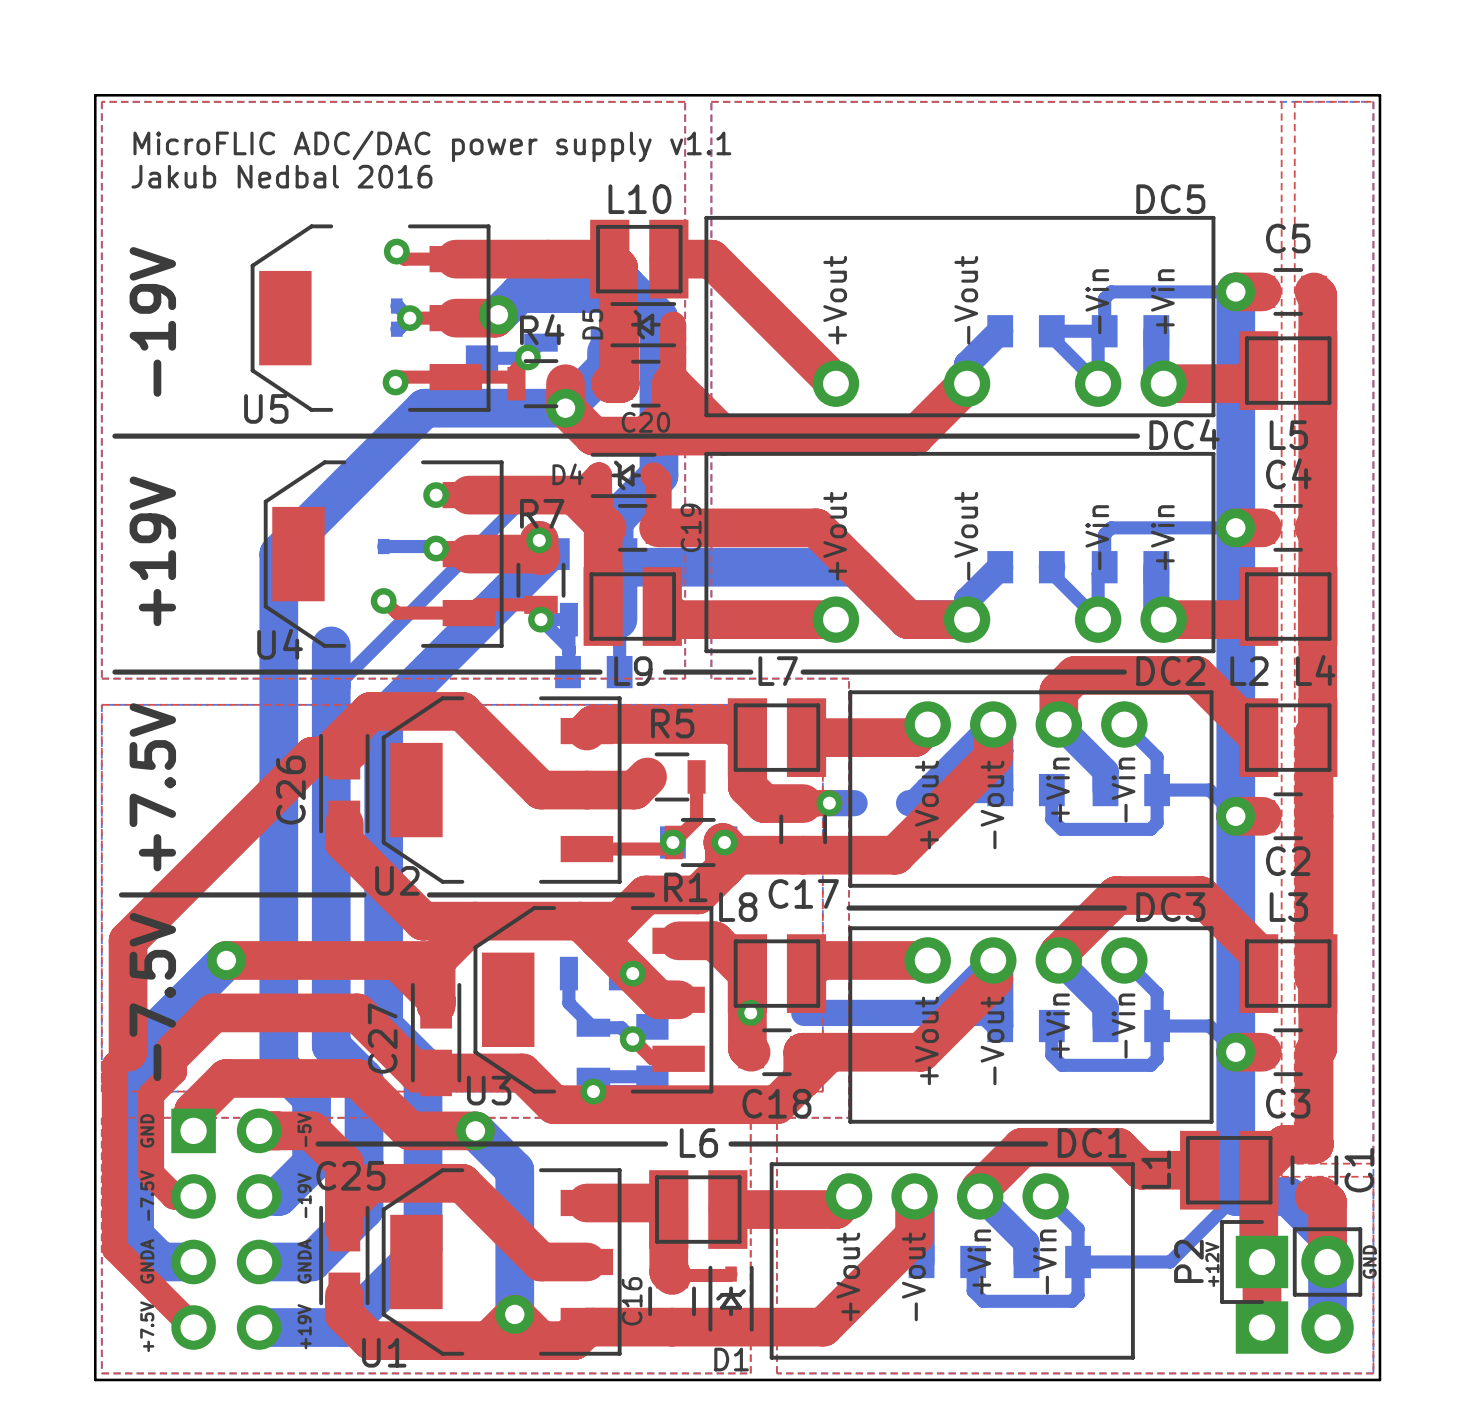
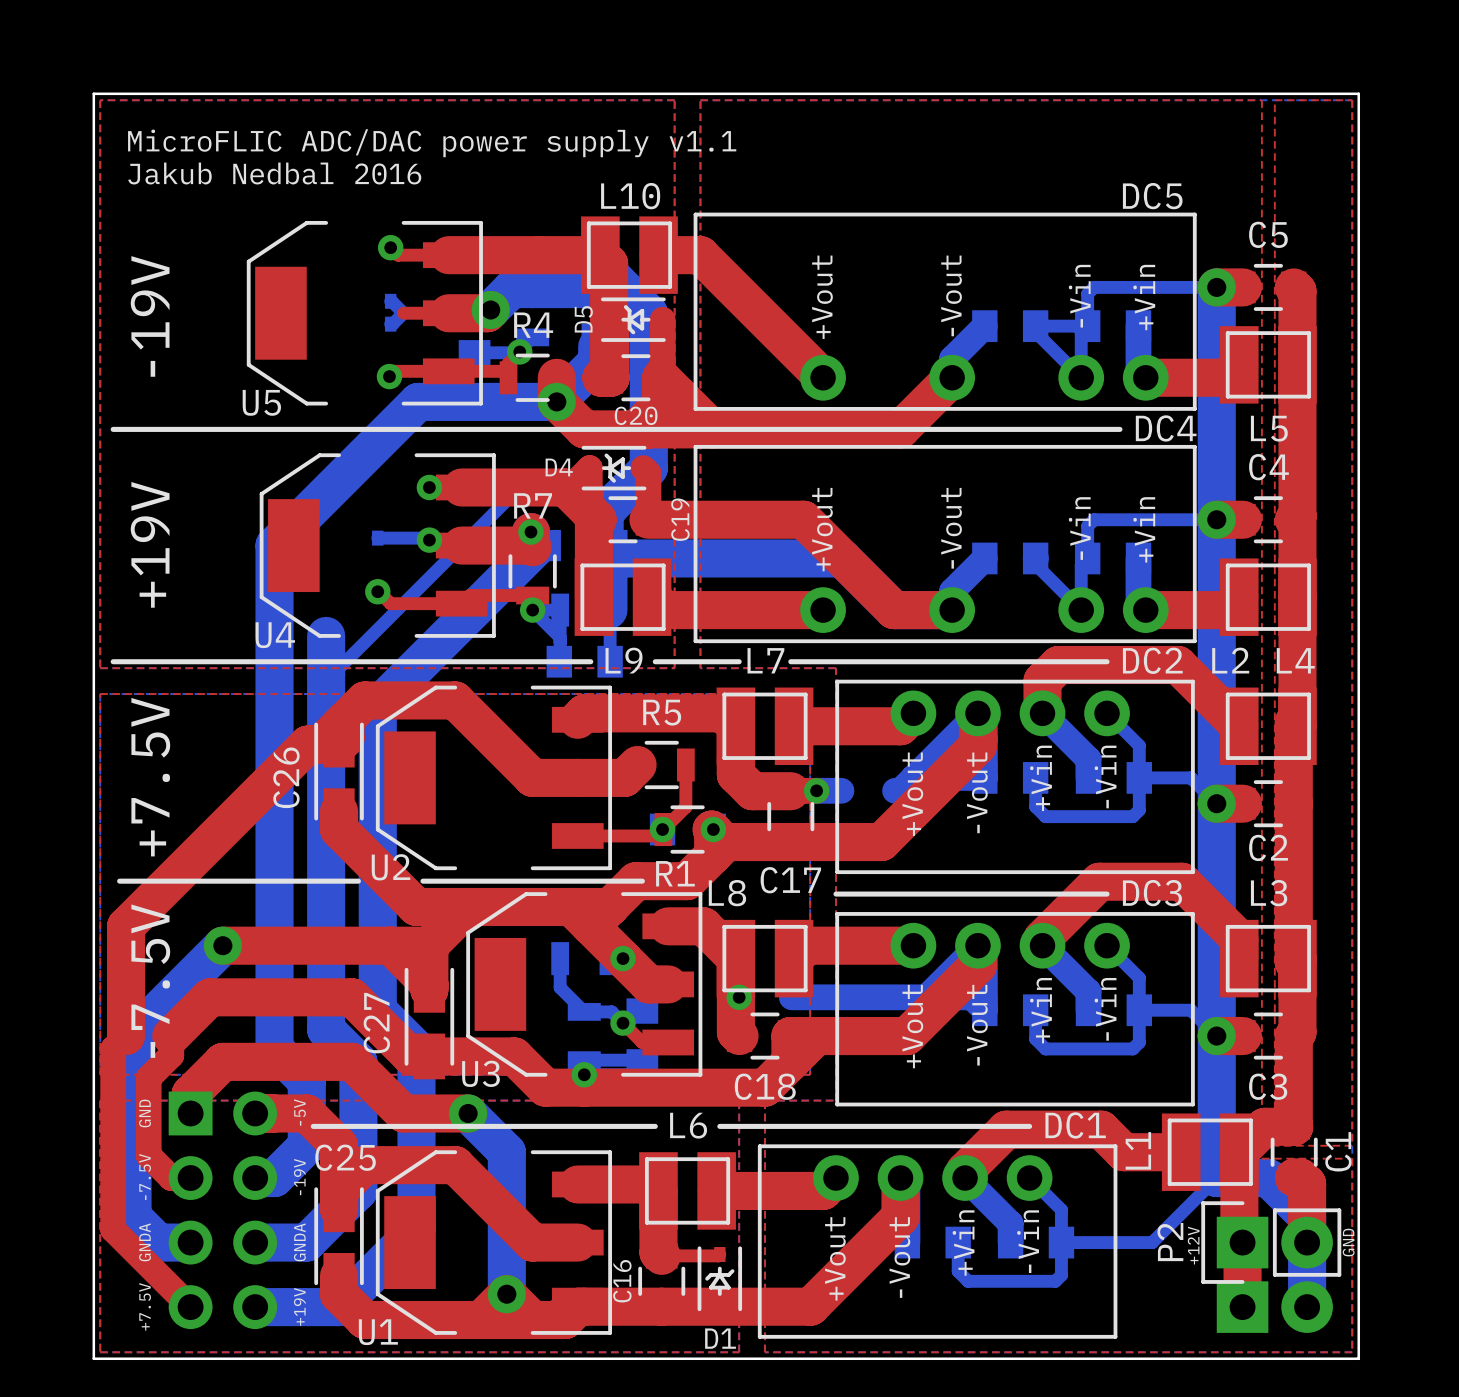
via: (409, 318) -> none

